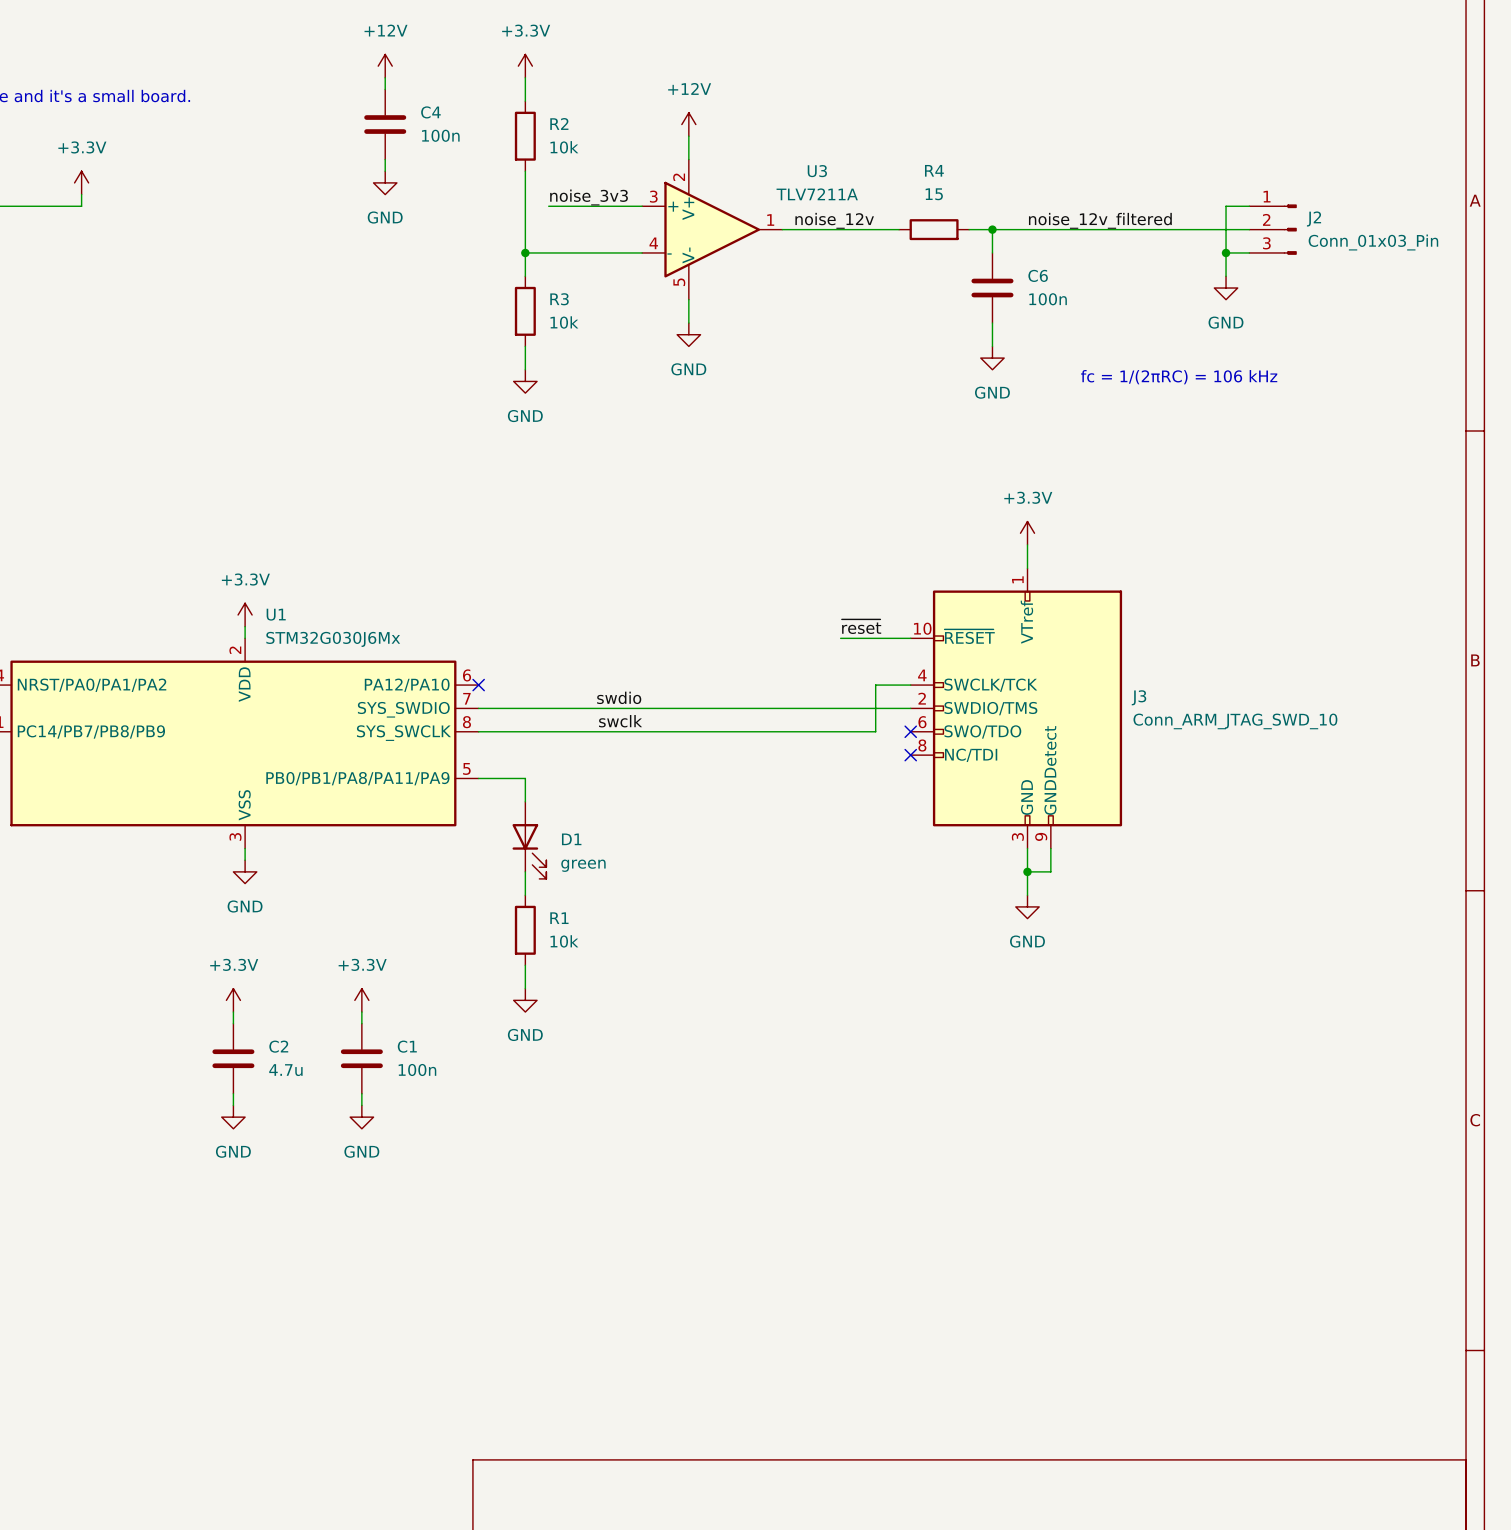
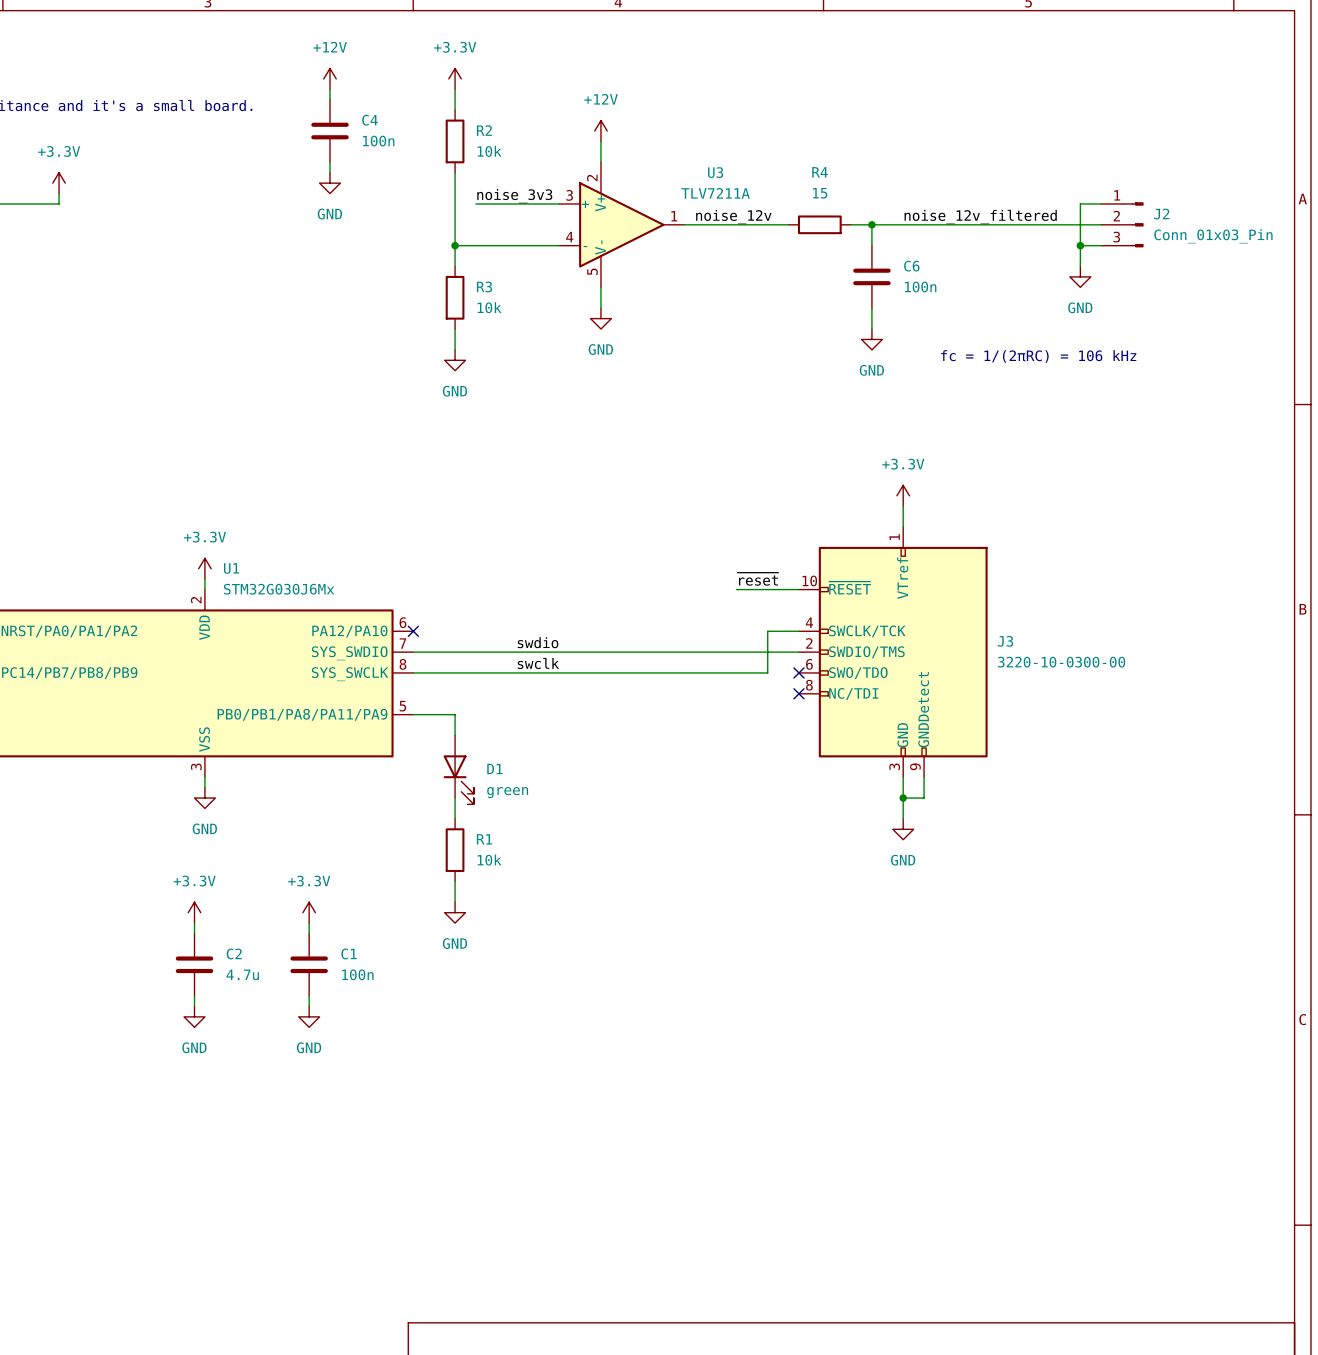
J3 value: Conn_ARM_JTAG_SWD_10 (1235, 721) -> 3220-10-0300-00 (1061, 662)

